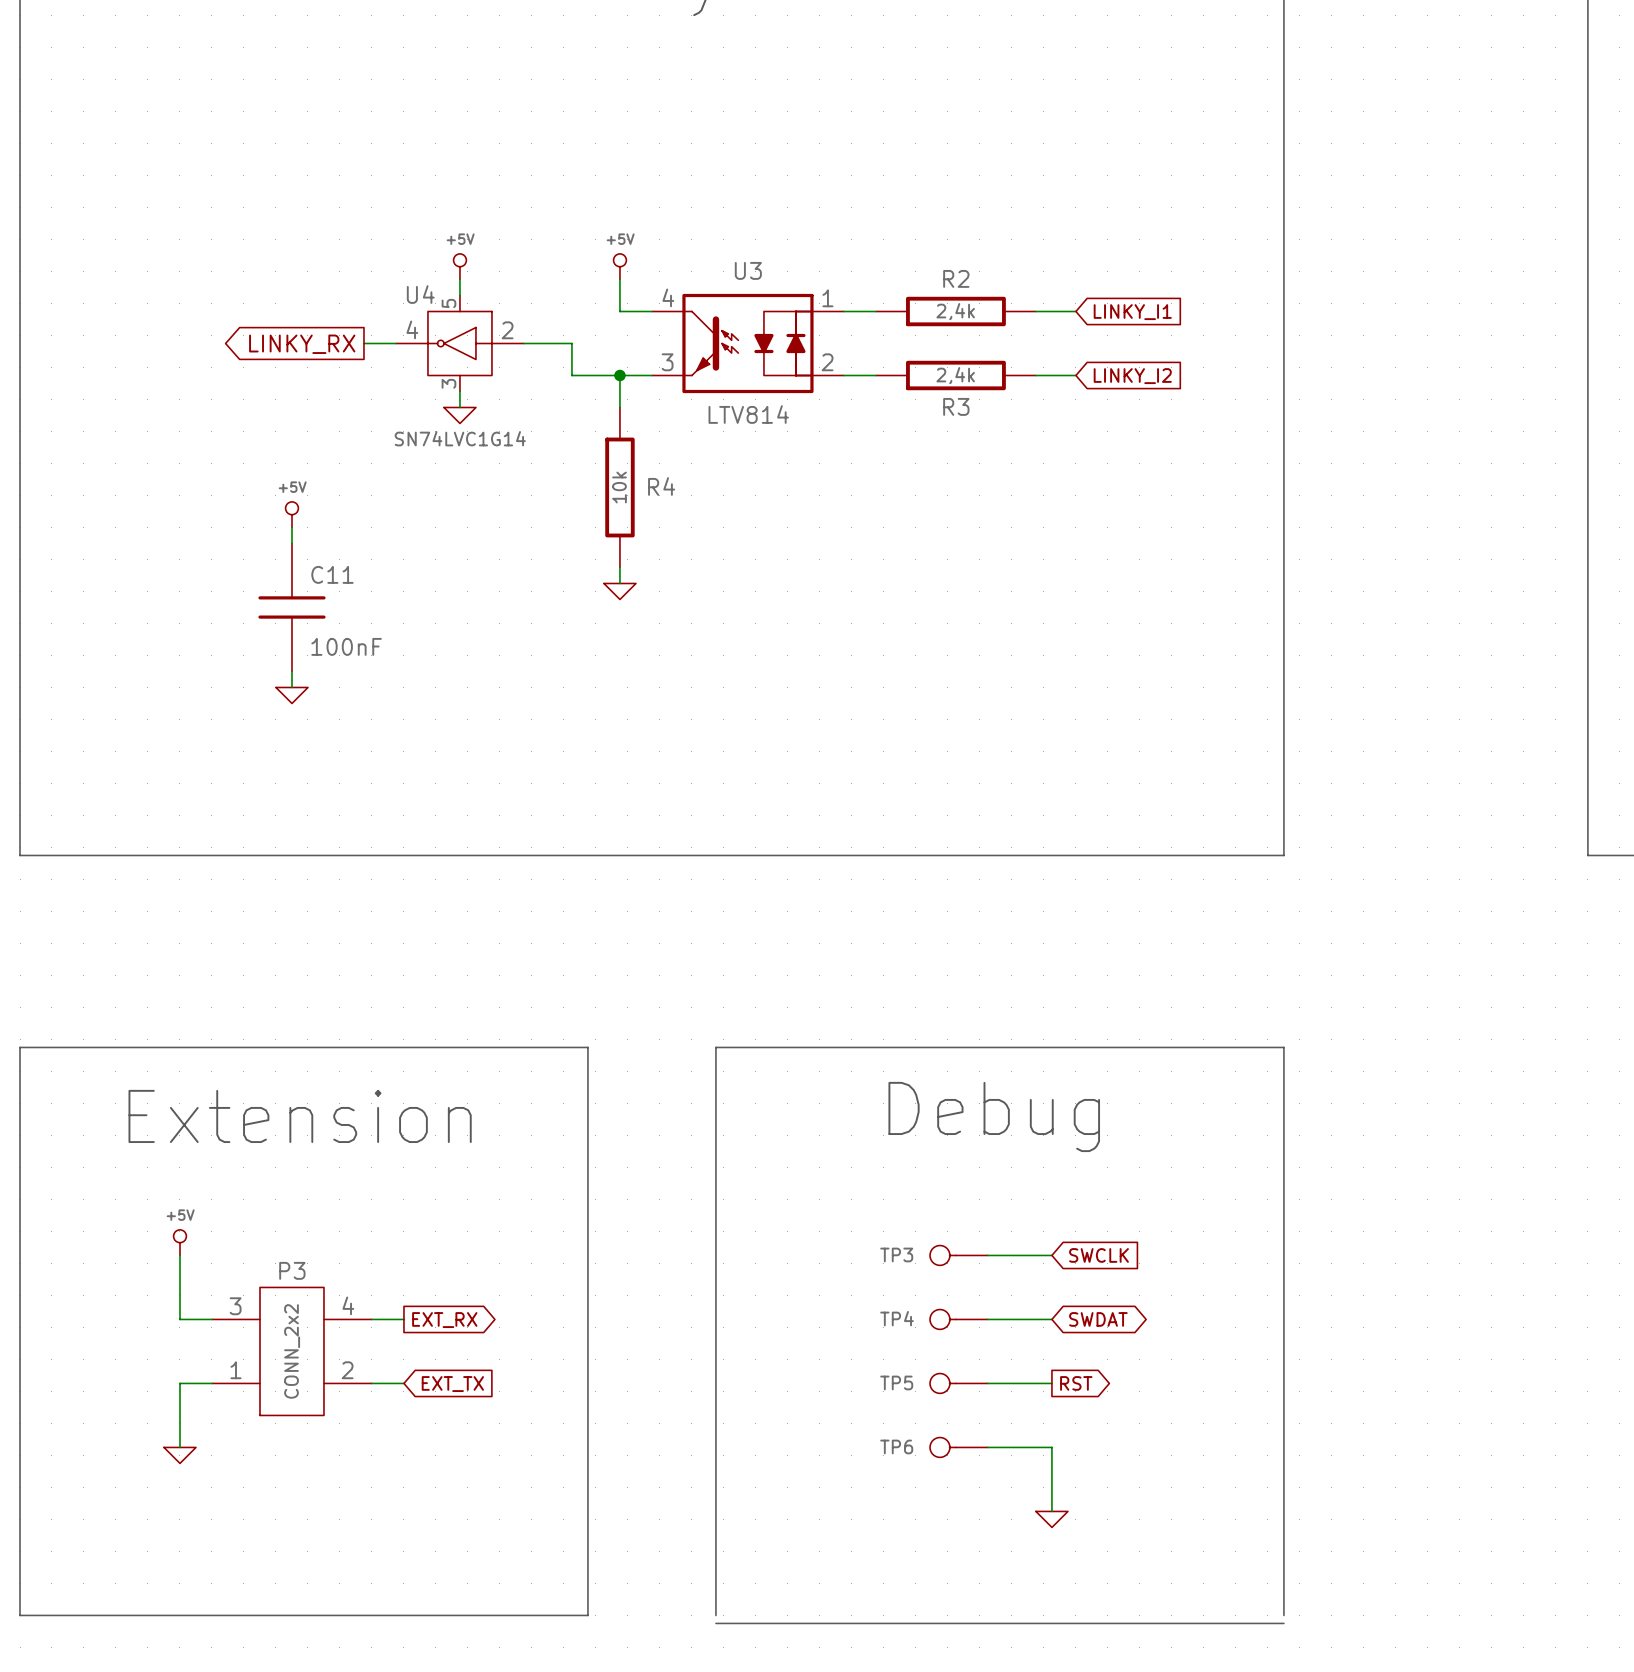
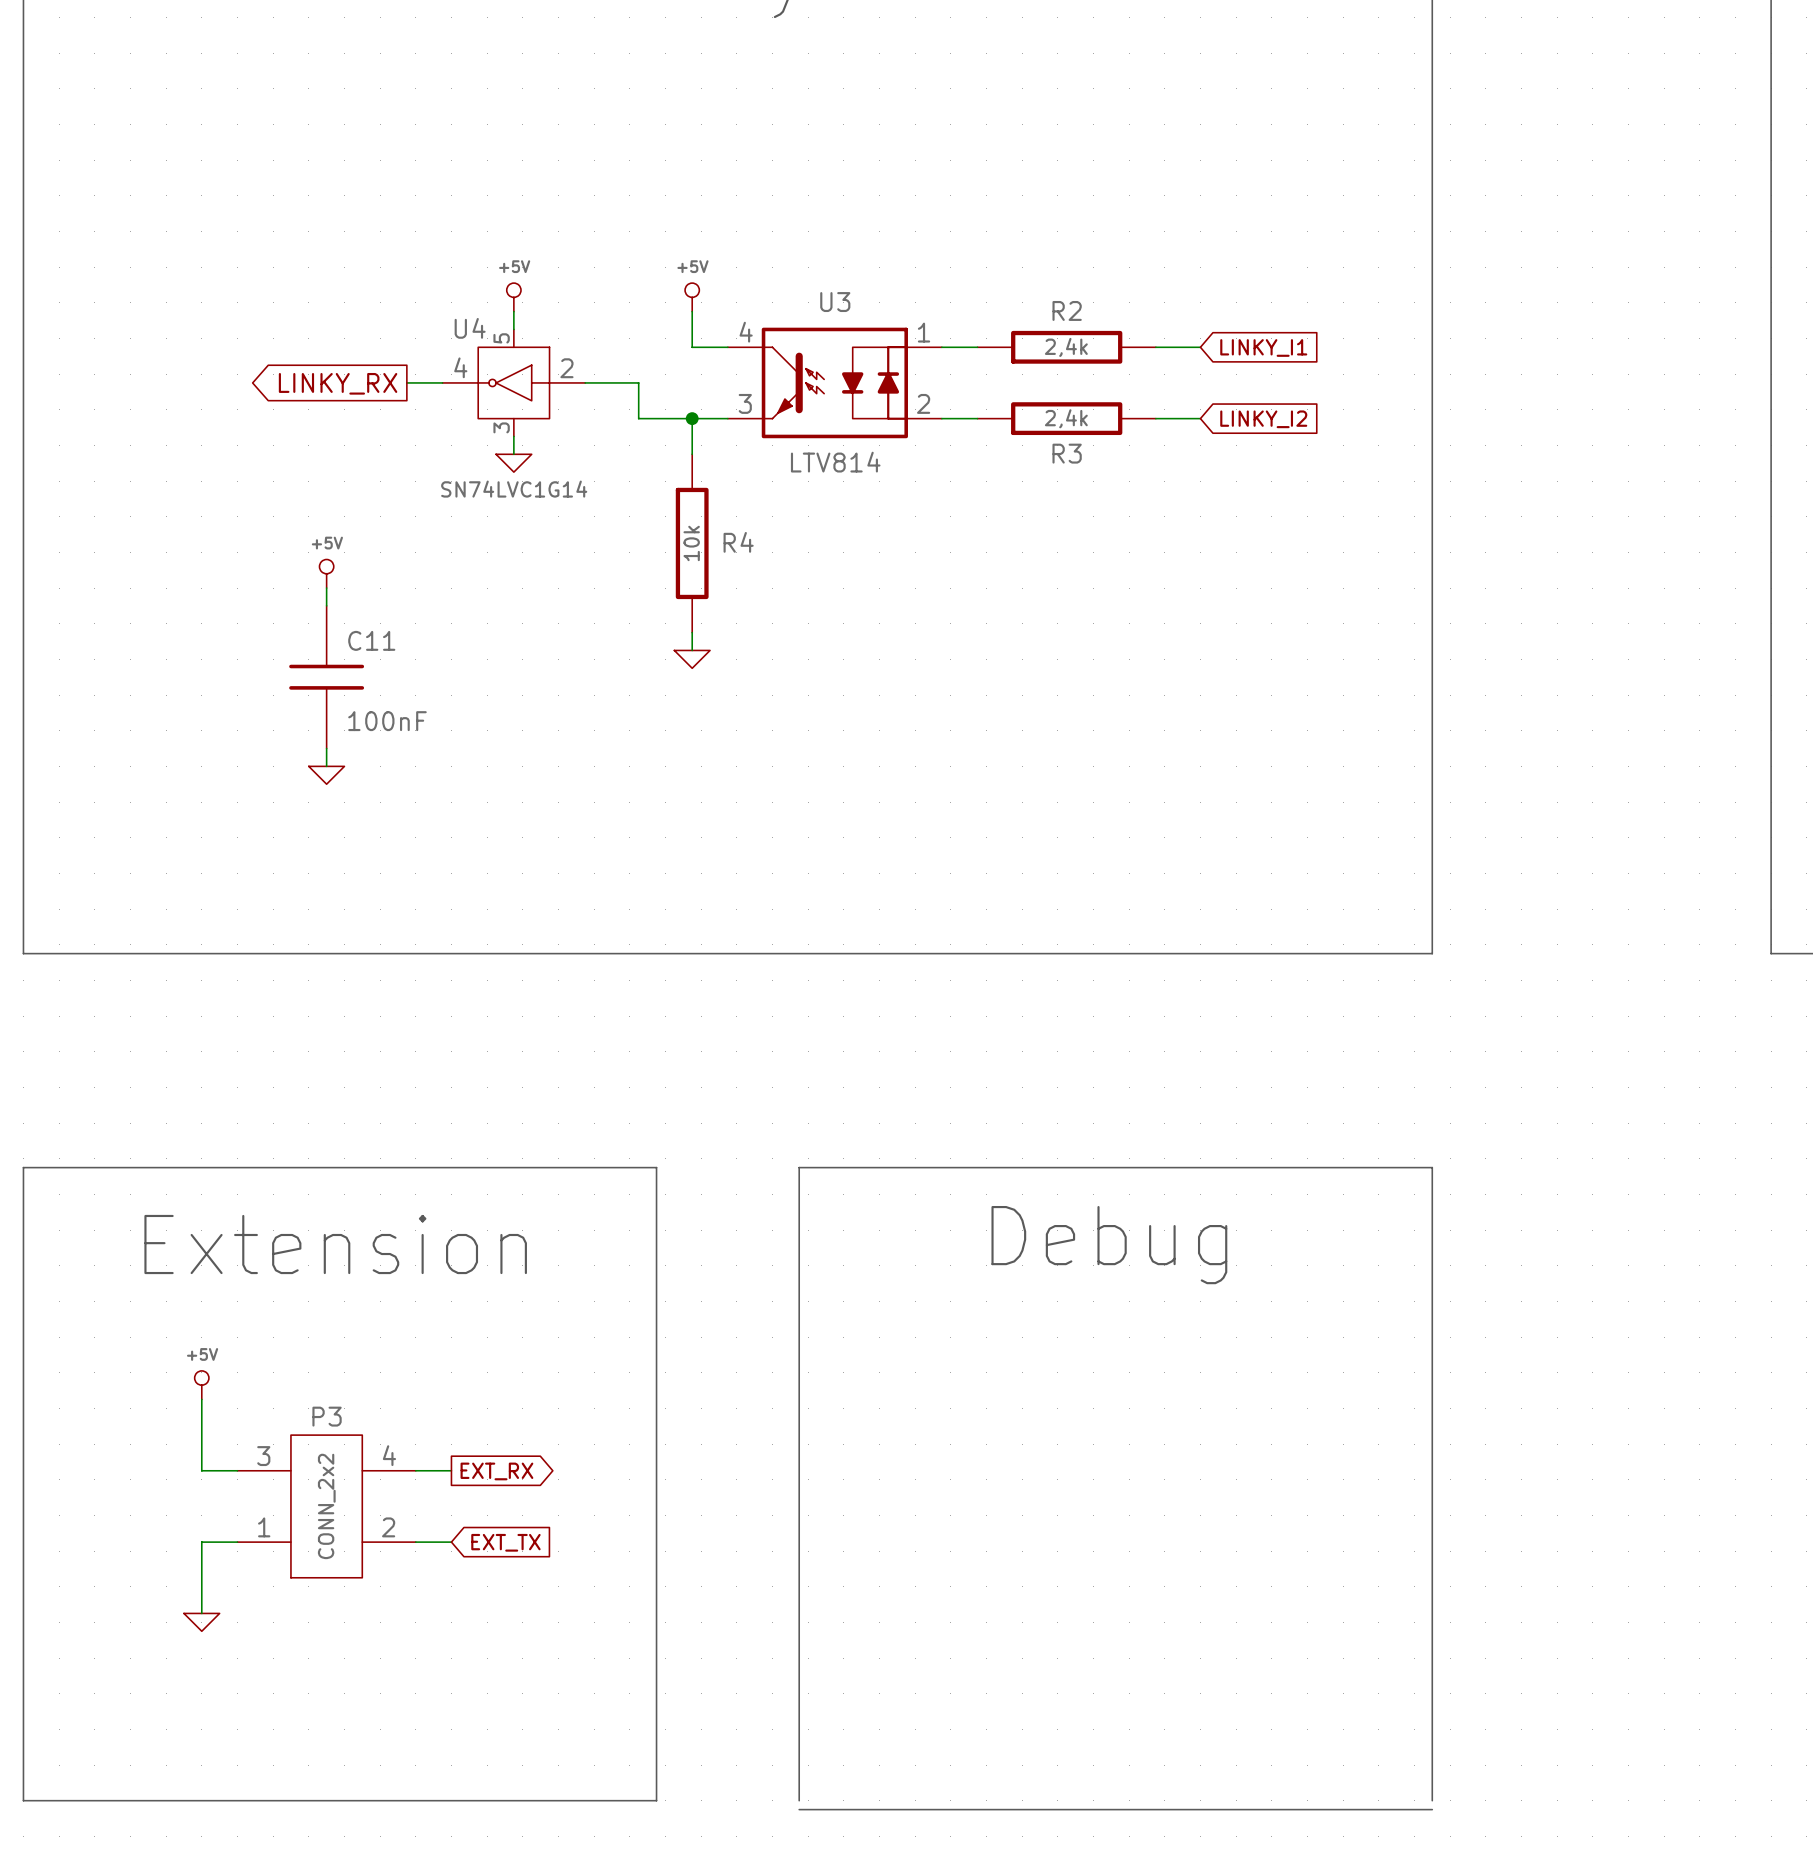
TP3: (958, 1255) -> none
wire: (987, 1255) (1051, 1255) -> none
global label: SWCLK (1099, 1255) -> none
TP4: (958, 1319) -> none
wire: (987, 1319) (1051, 1319) -> none
global label: SWDAT (1098, 1319) -> none
TP5: (958, 1383) -> none
wire: (987, 1383) (1051, 1383) -> none
global label: RST (1076, 1383) -> none
TP6: (958, 1447) -> none
wire: (987, 1447) (1051, 1447) (1051, 1511) -> none
power symbol: (1051, 1519) -> none

